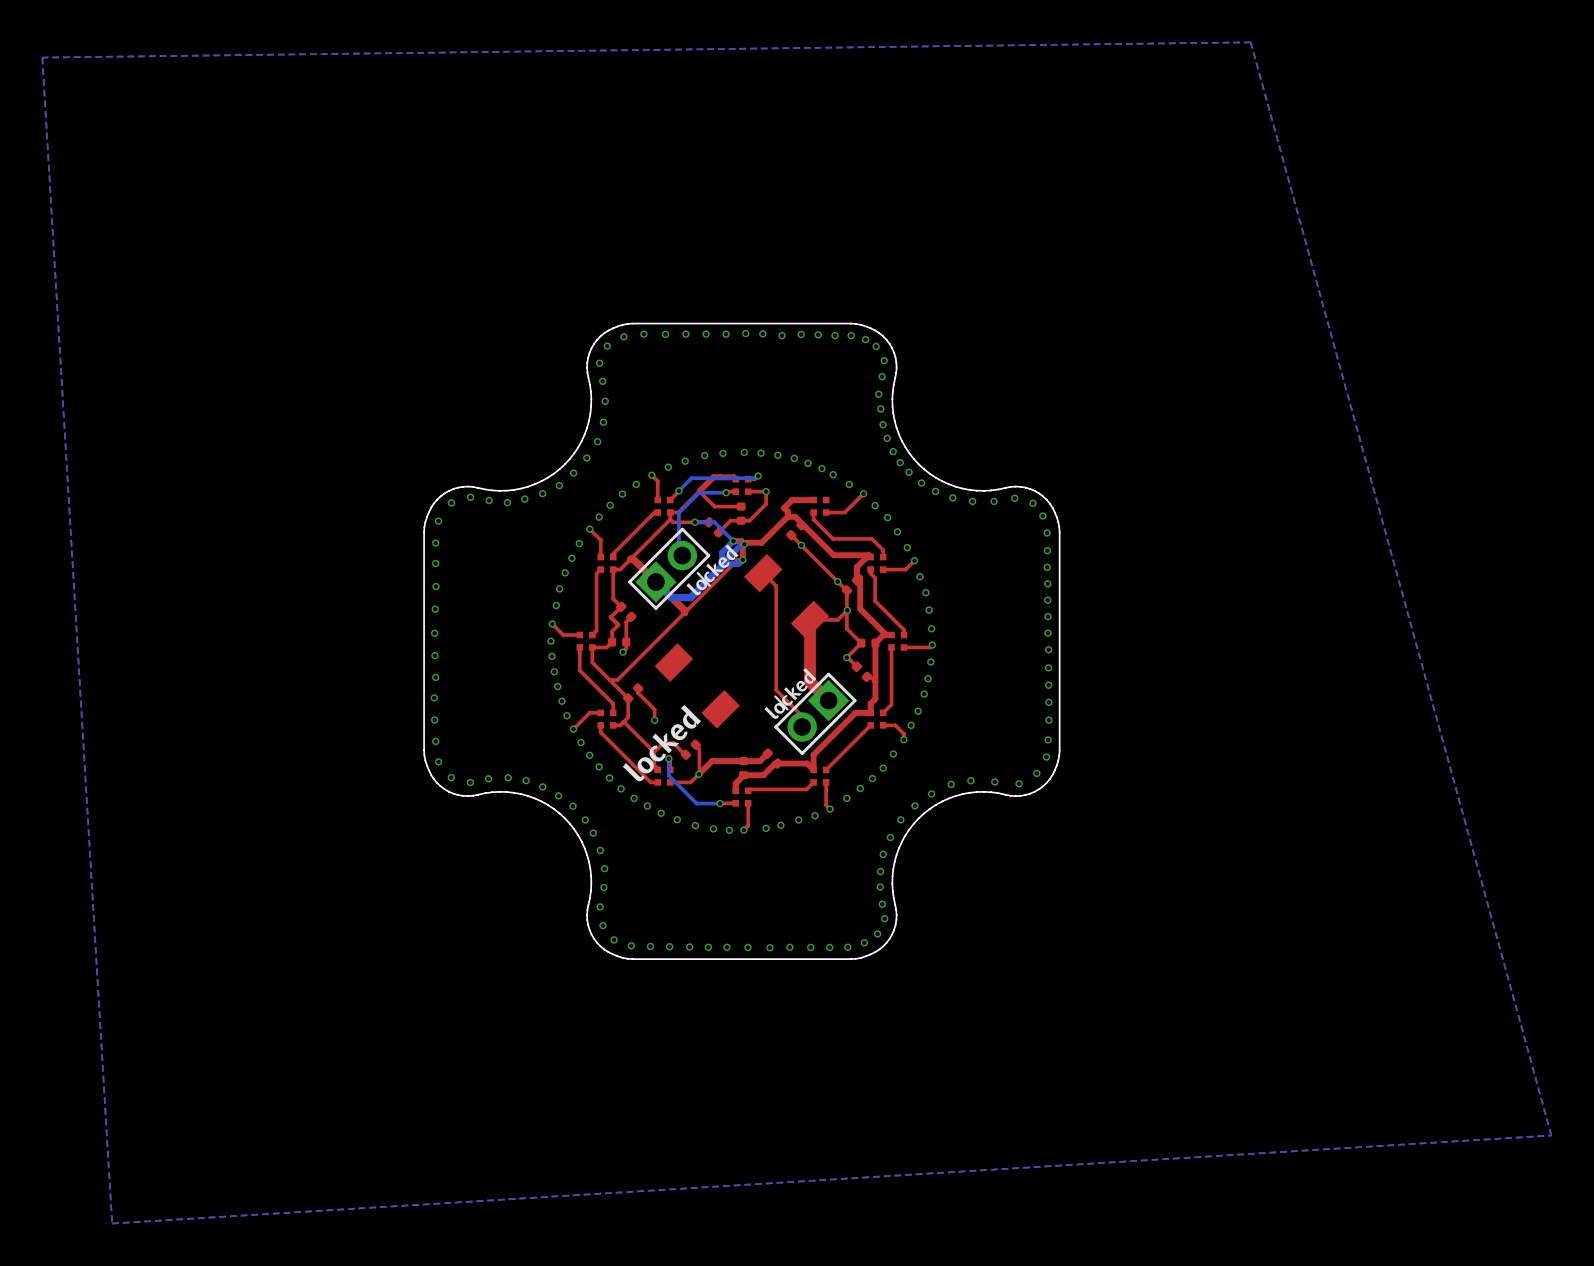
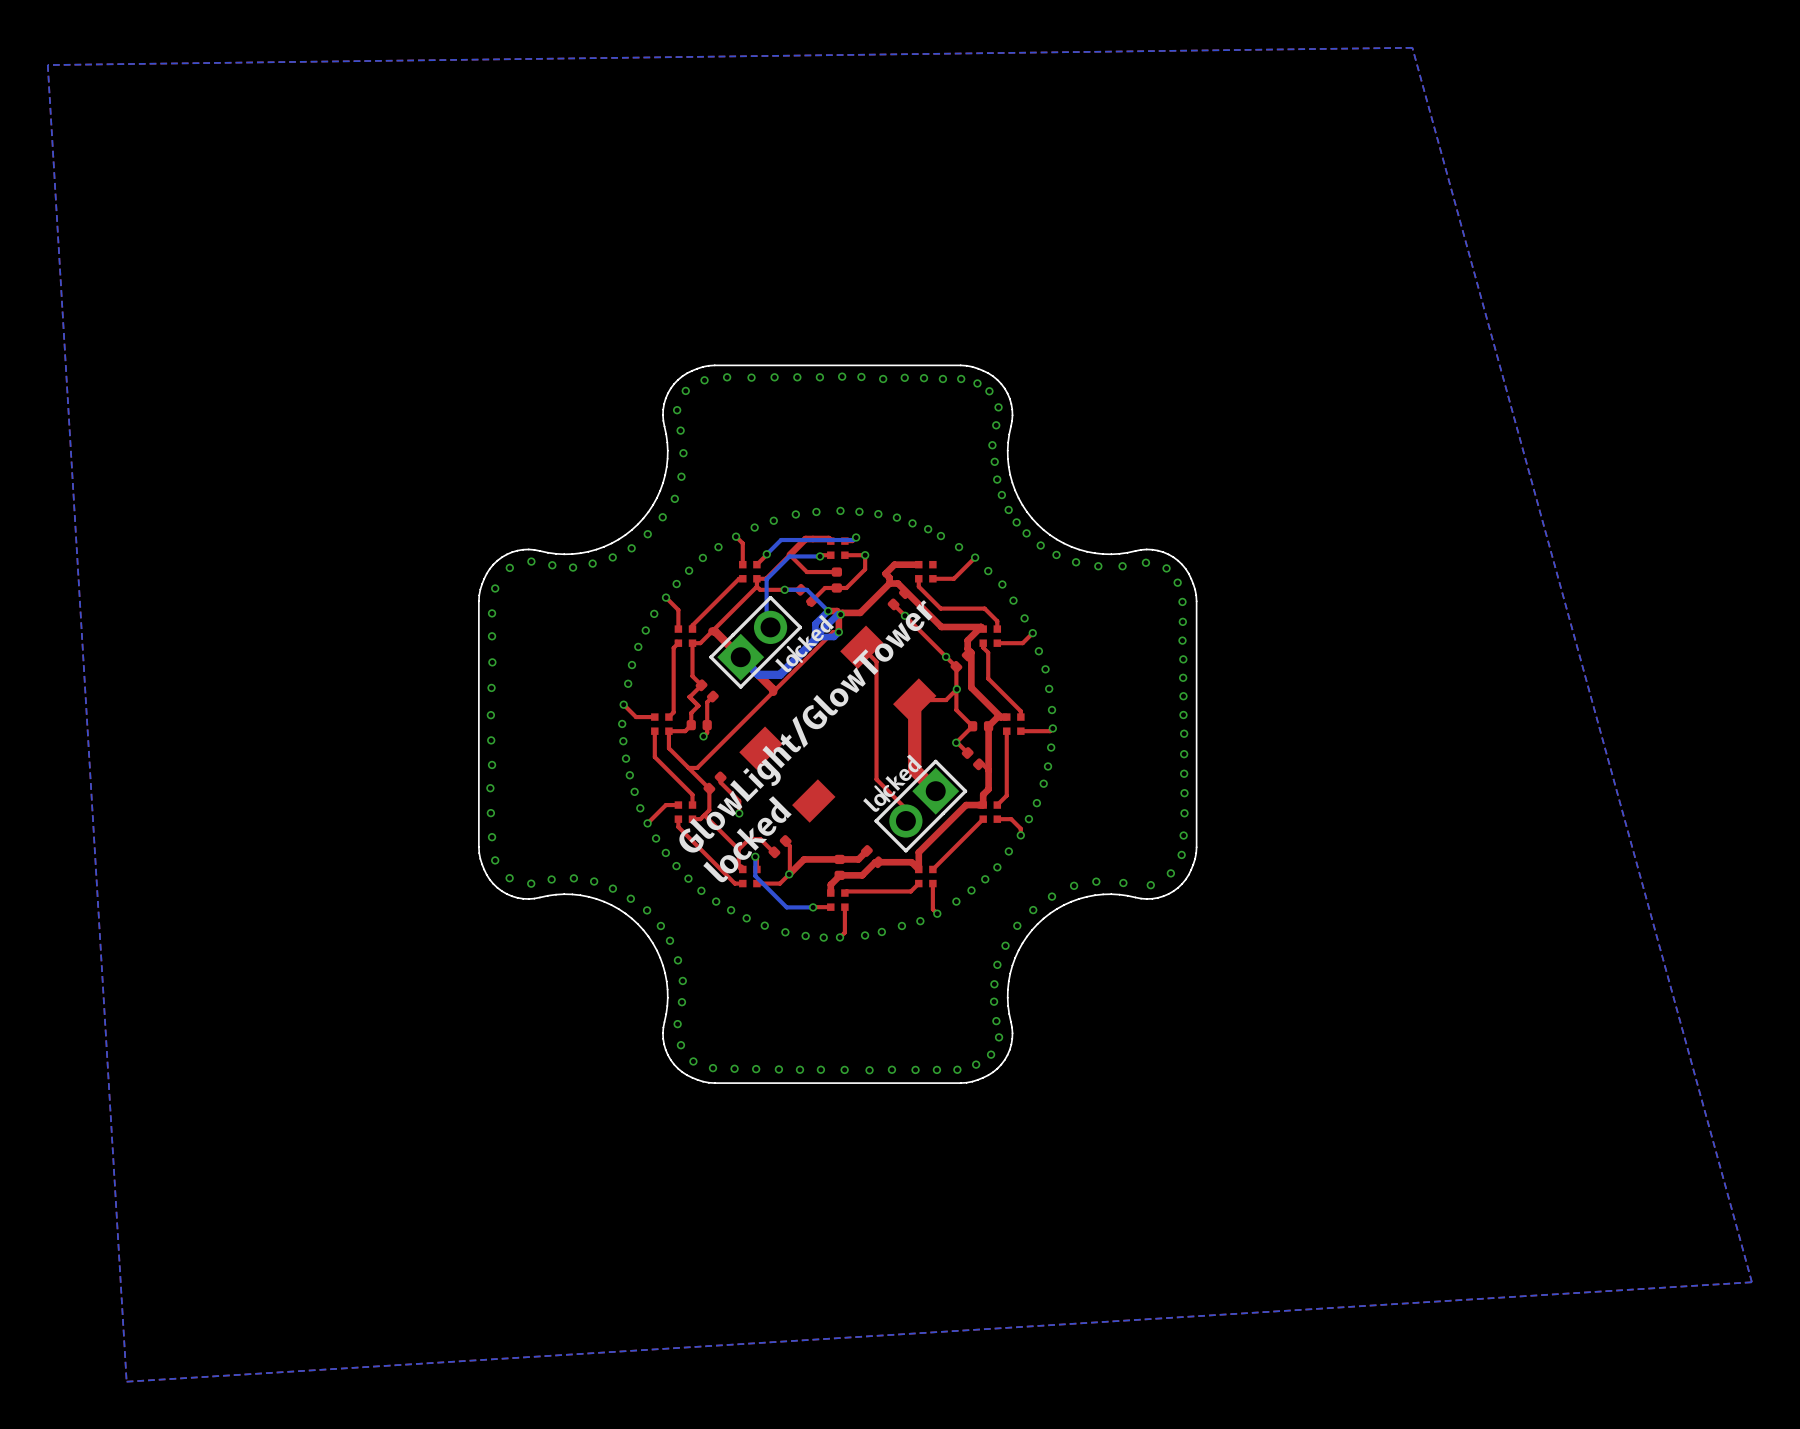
text: none -> GlowLight/GlowTower (805, 726)

